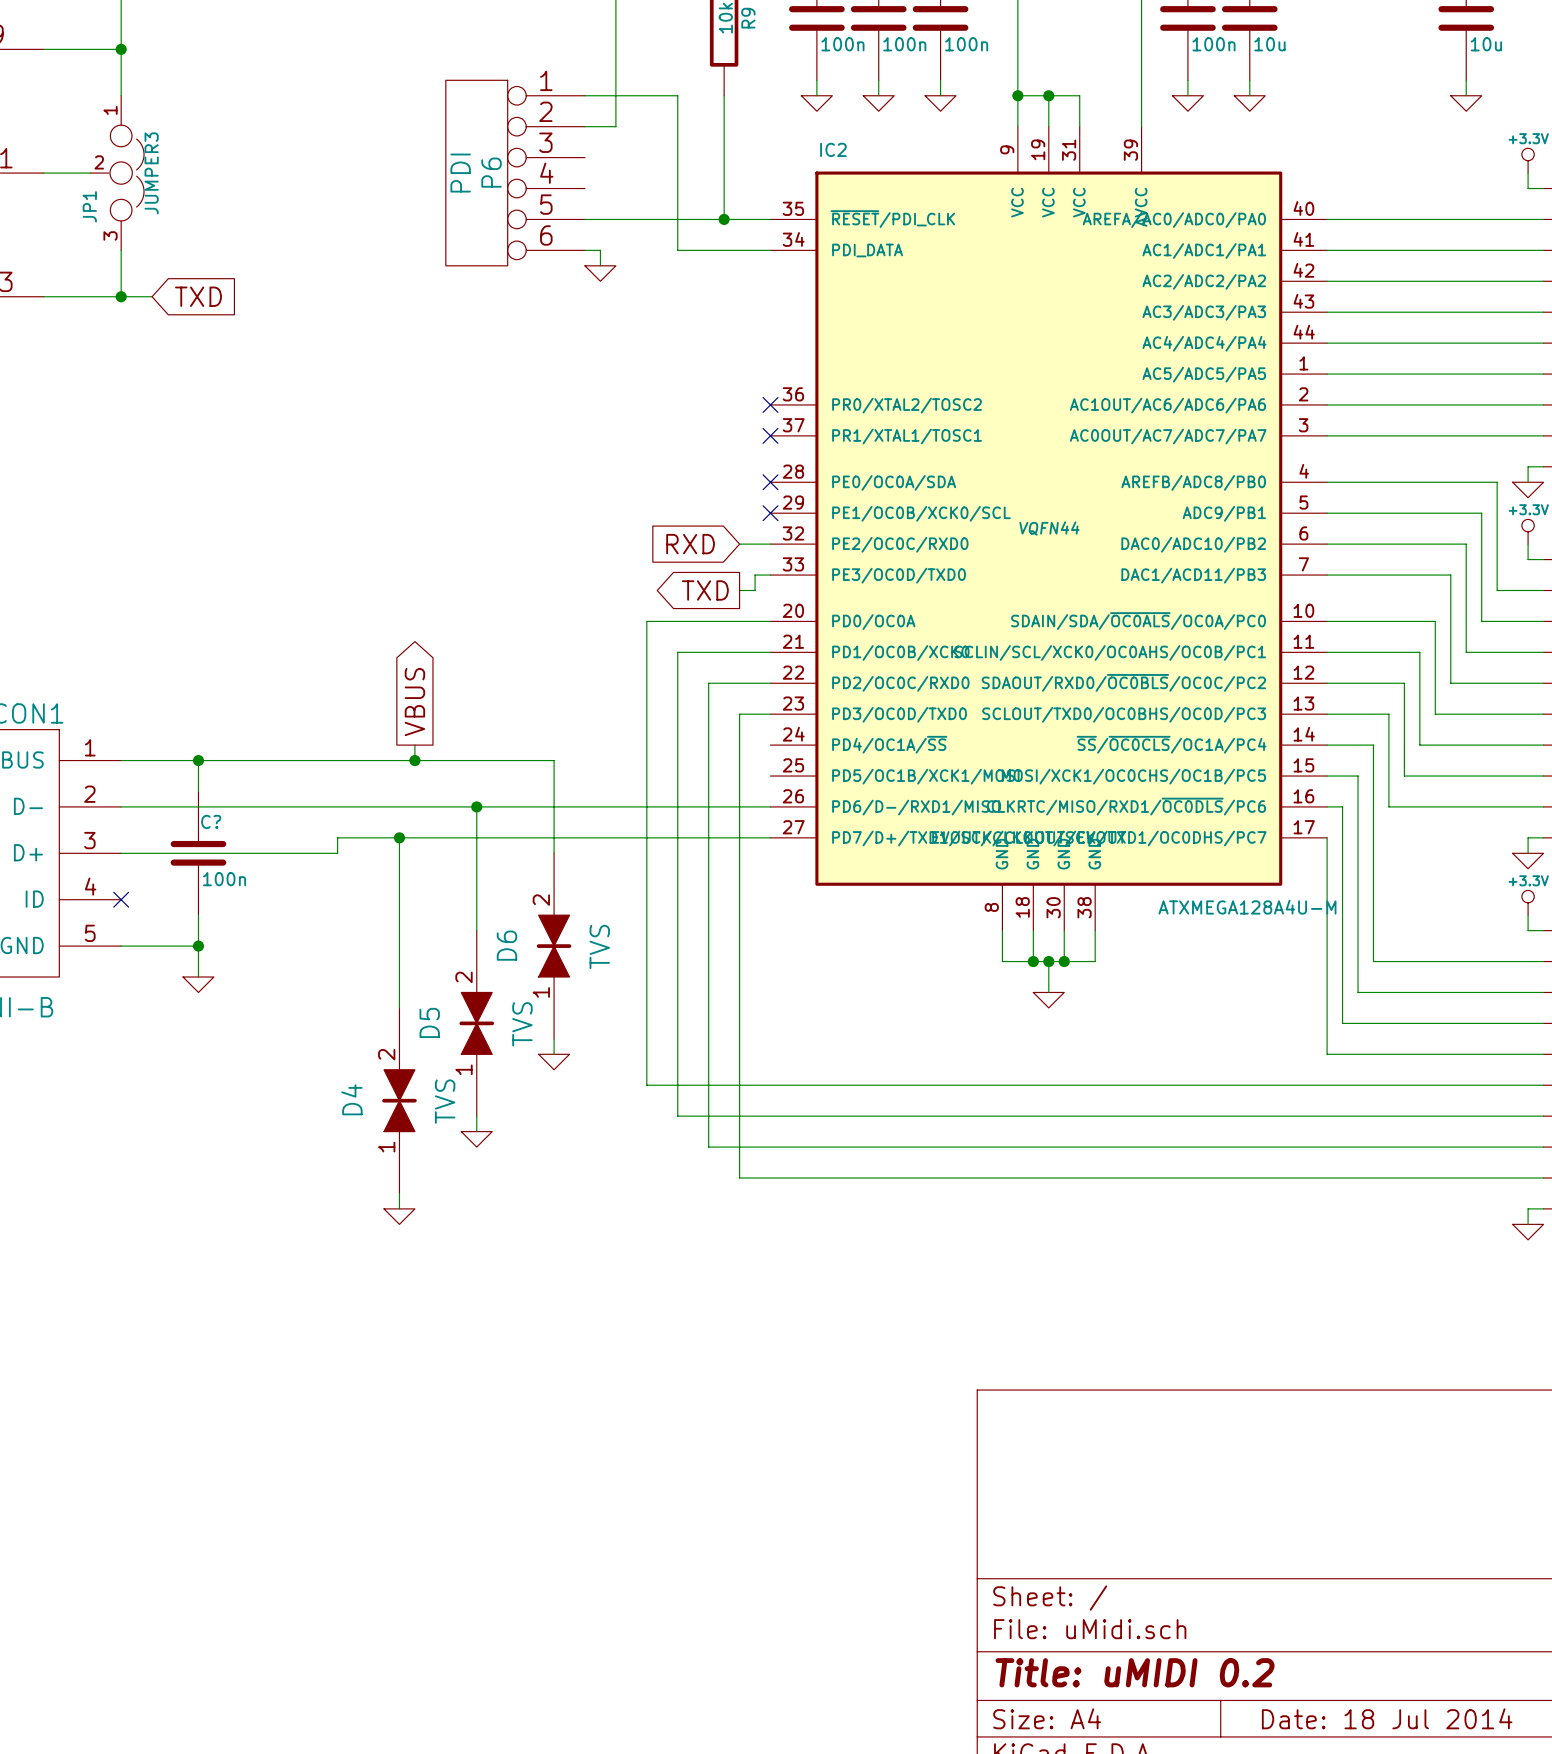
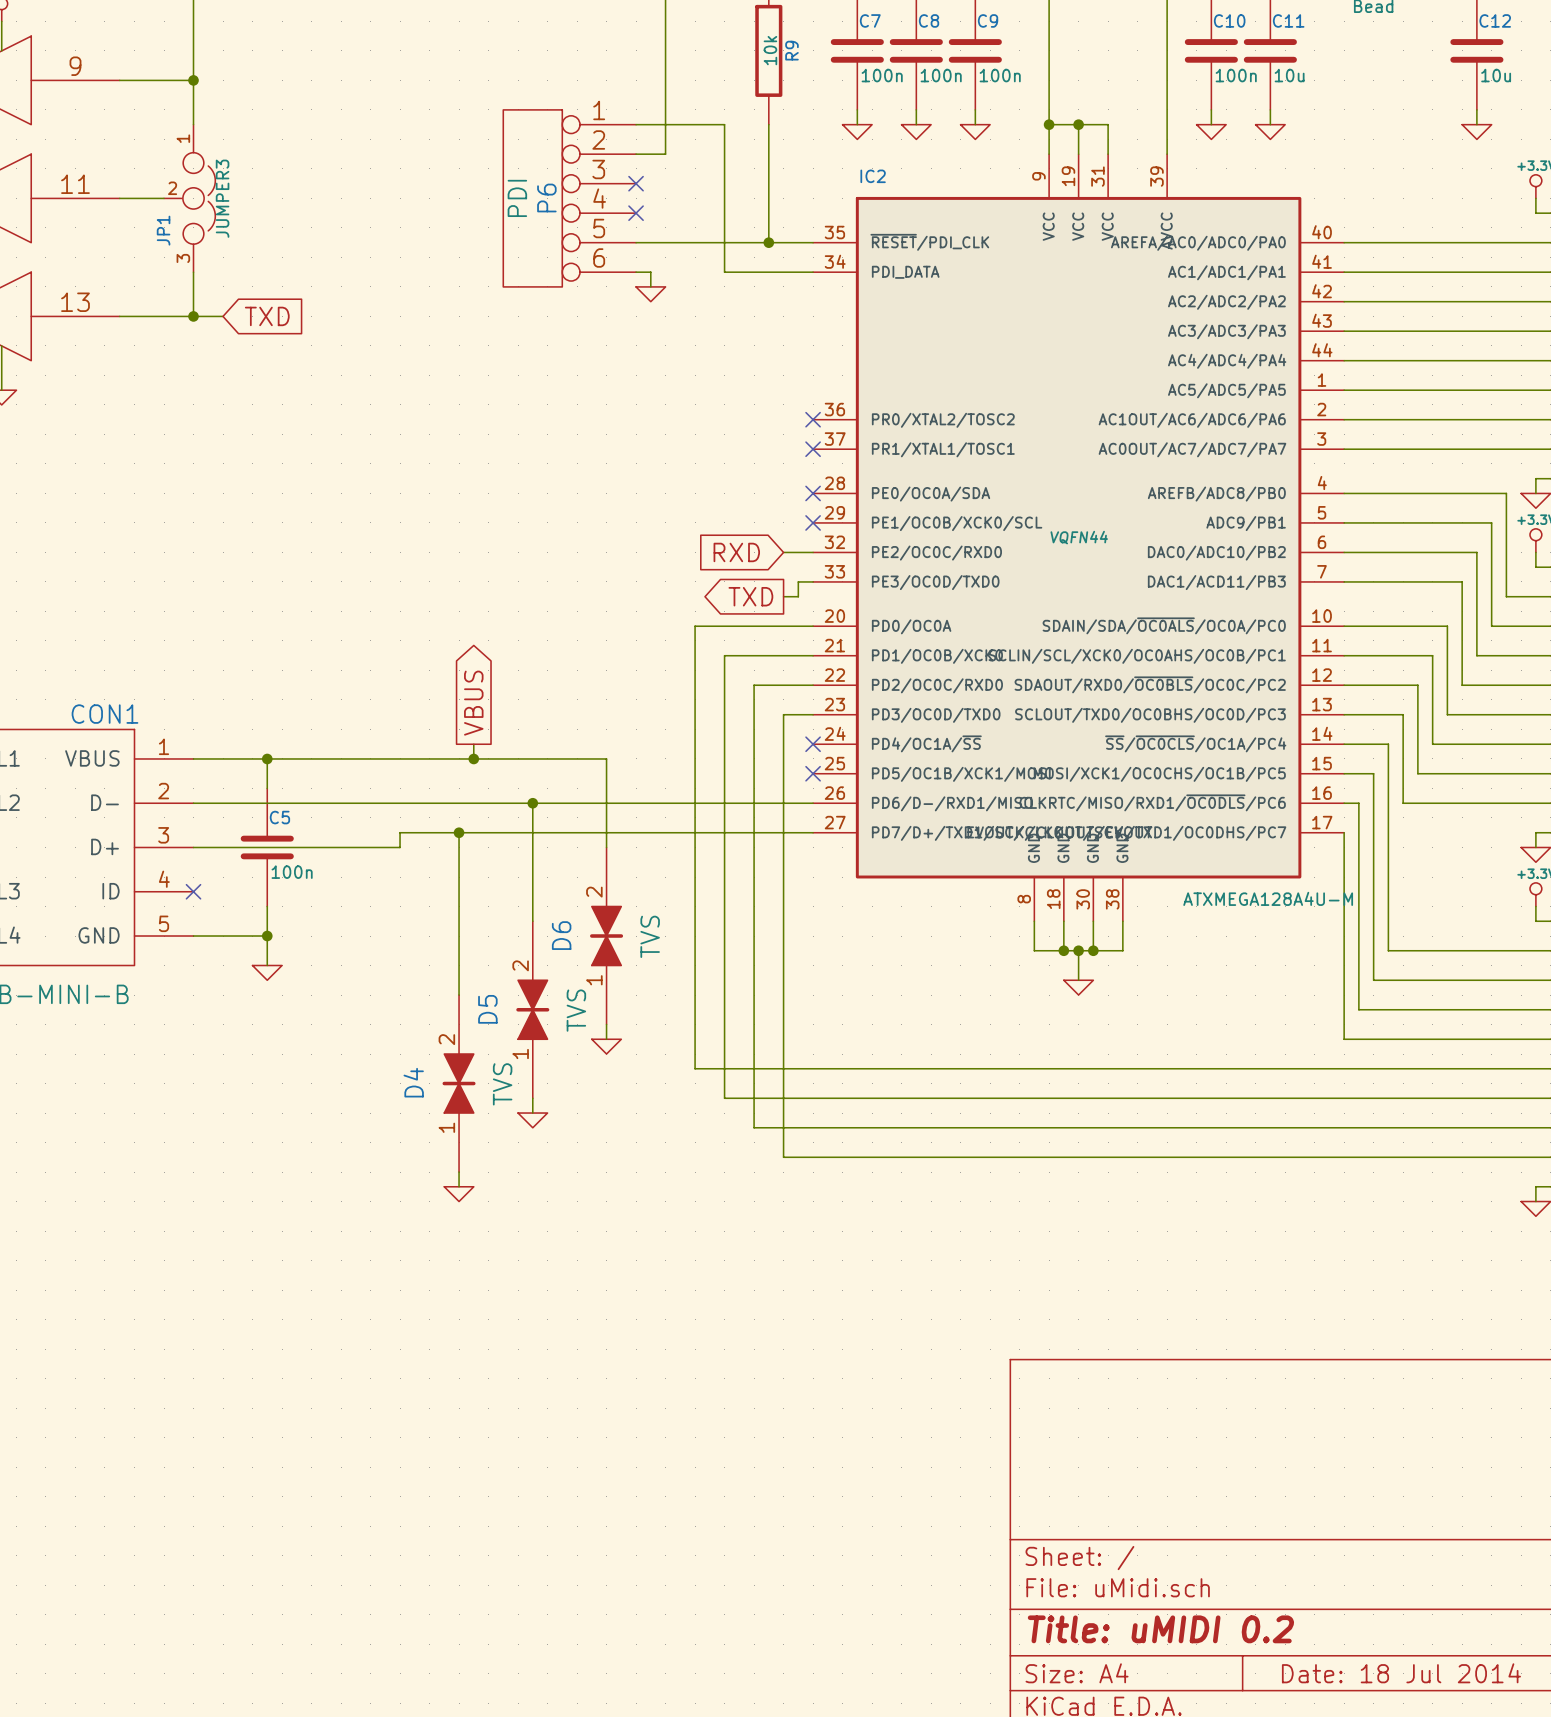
no-connect mark: none -> (636, 183)
no-connect mark: none -> (636, 213)
no-connect mark: none -> (813, 744)
no-connect mark: none -> (813, 773)
C? name: C? (211, 821) -> C5 (279, 817)

